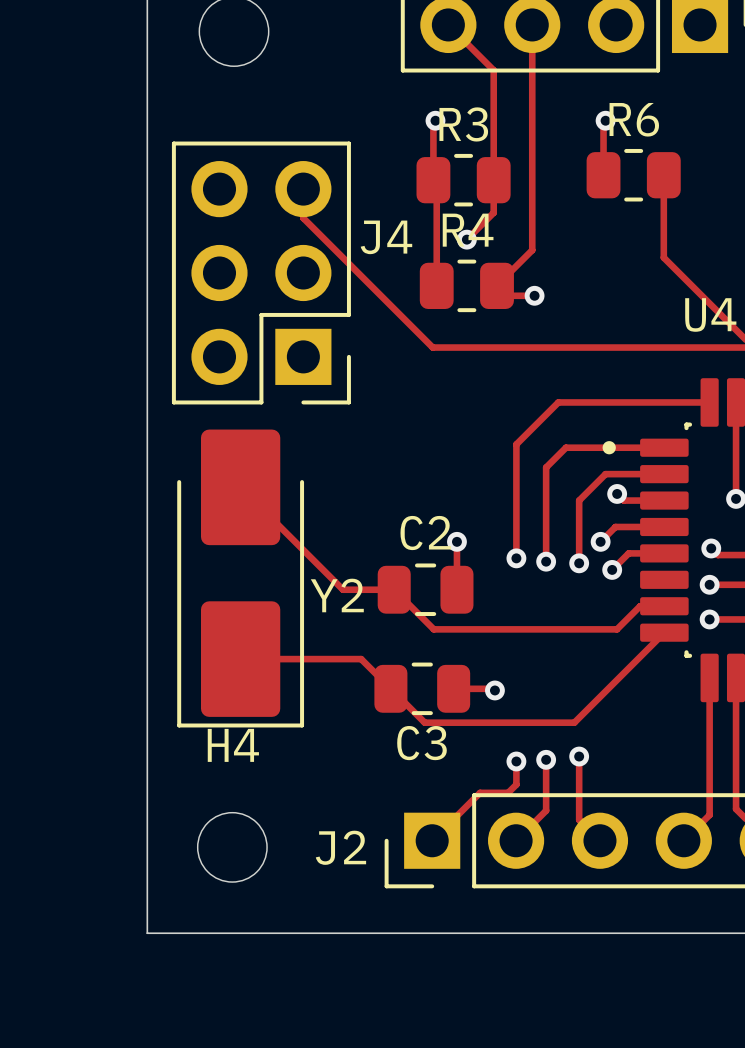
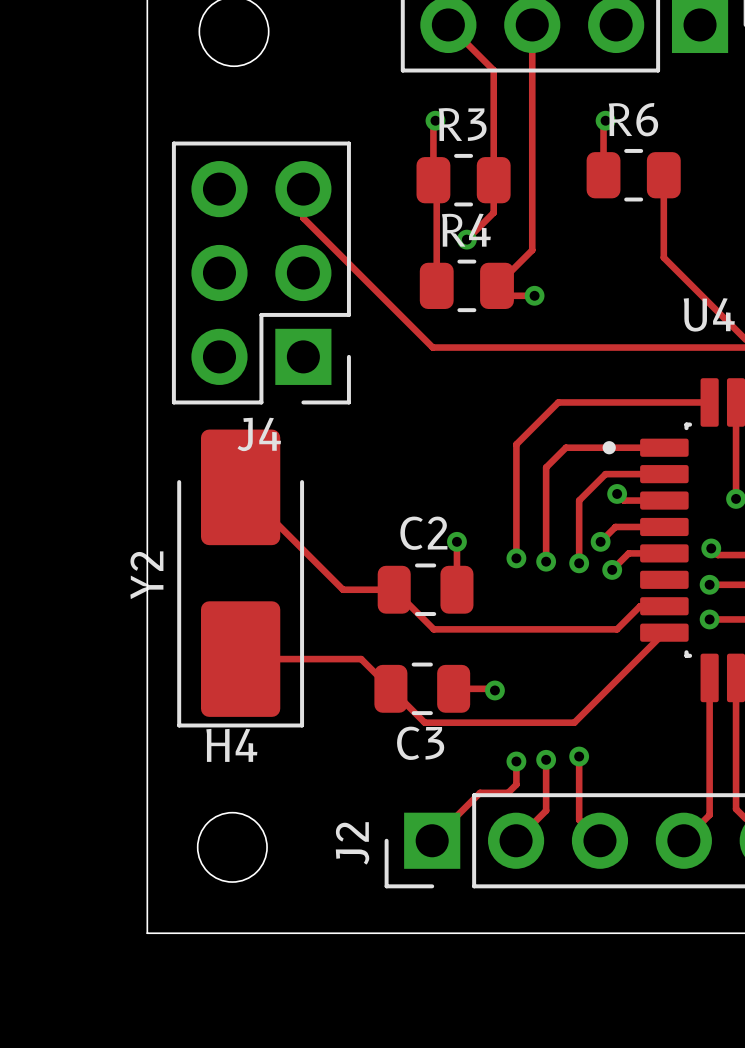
J4 name position: J4 (386, 237) -> J4 (259, 434)
Y2 name rotation: 0° (337, 595) -> 90° counterclockwise (146, 575)
Y2 name position: Y2 (337, 595) -> Y2 (146, 575)
J2 name rotation: 0° (340, 847) -> 90° counterclockwise (352, 843)

